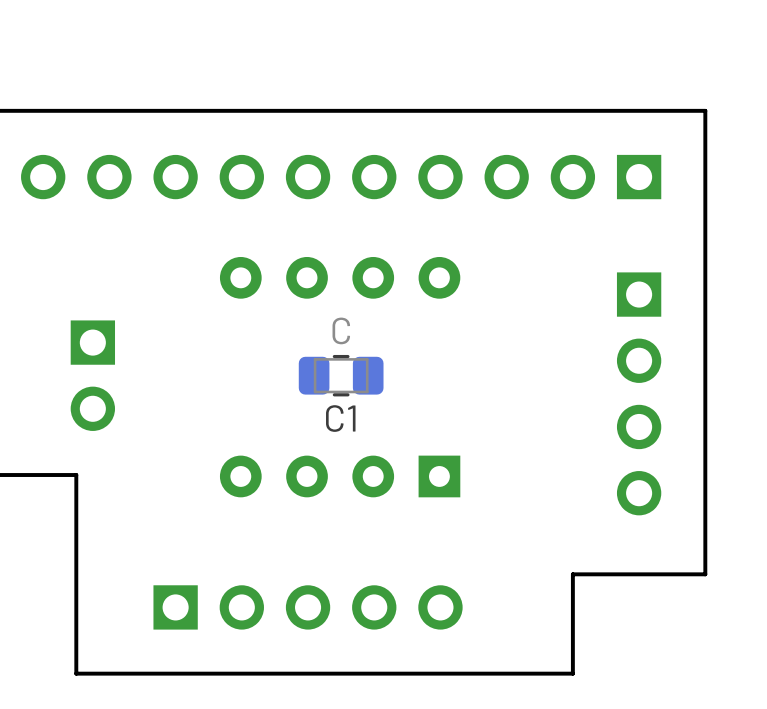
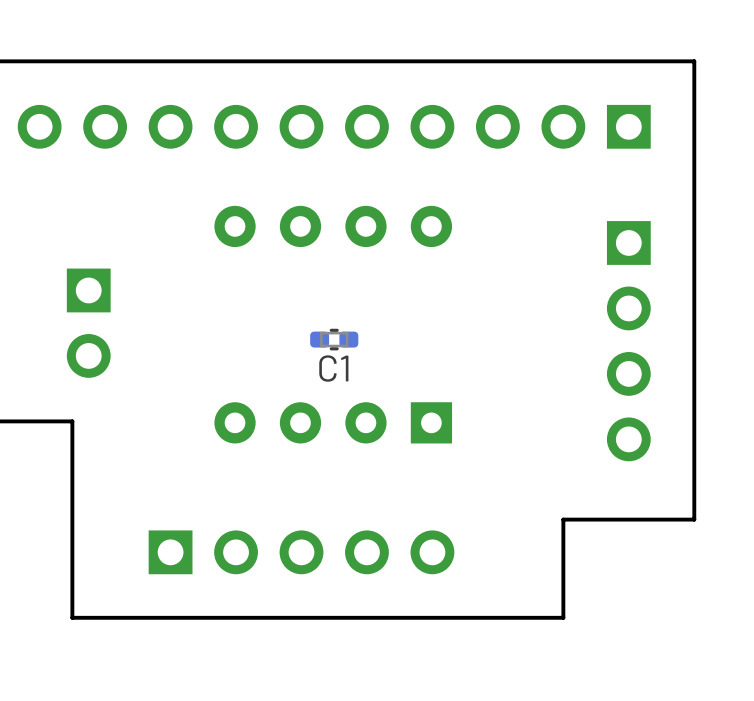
C1 value: C (341, 330) -> none
C1 footprint: [298, 354, 384, 397] -> [310, 328, 359, 351]

